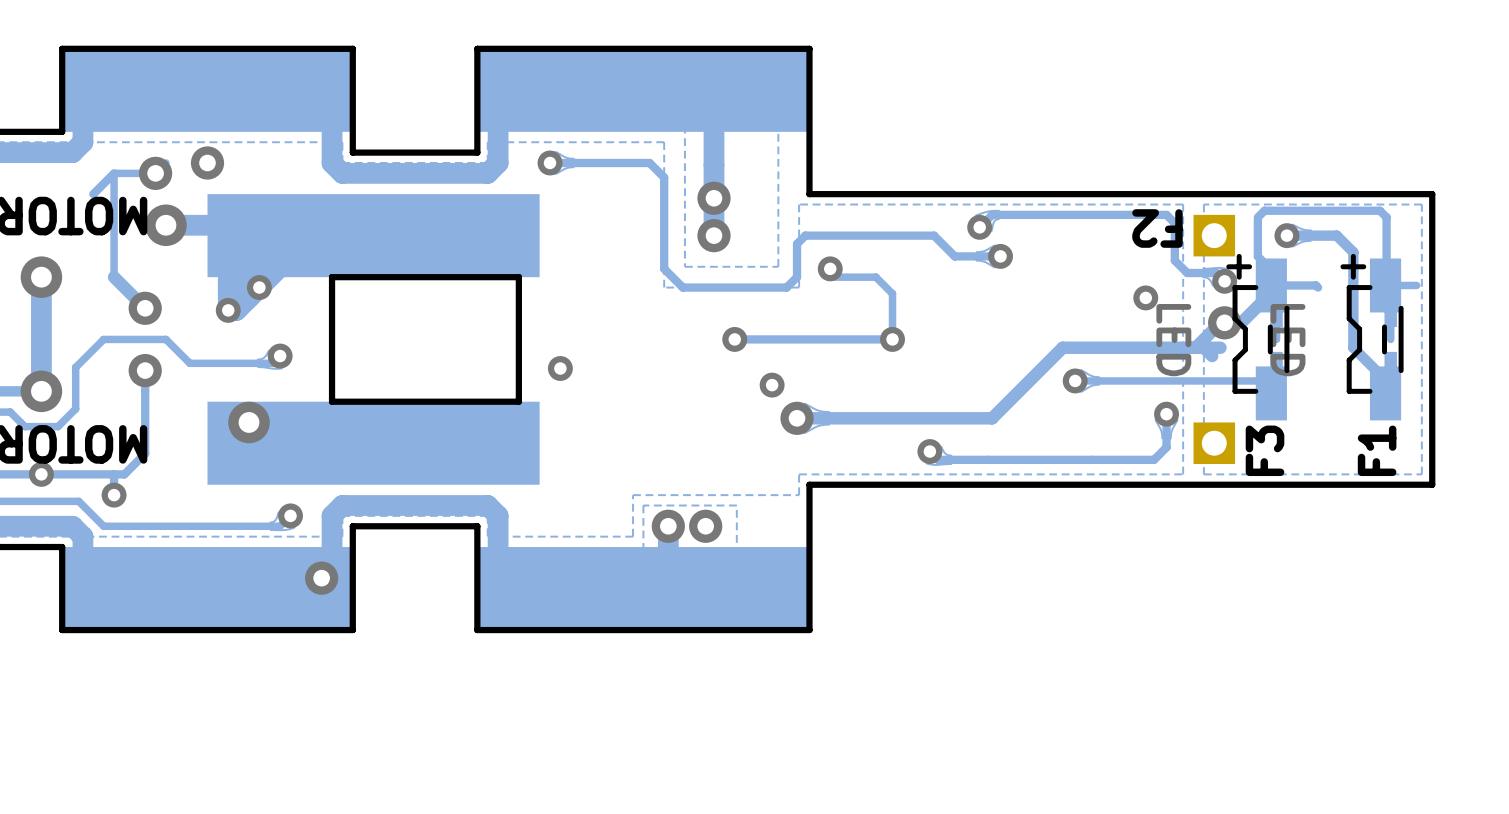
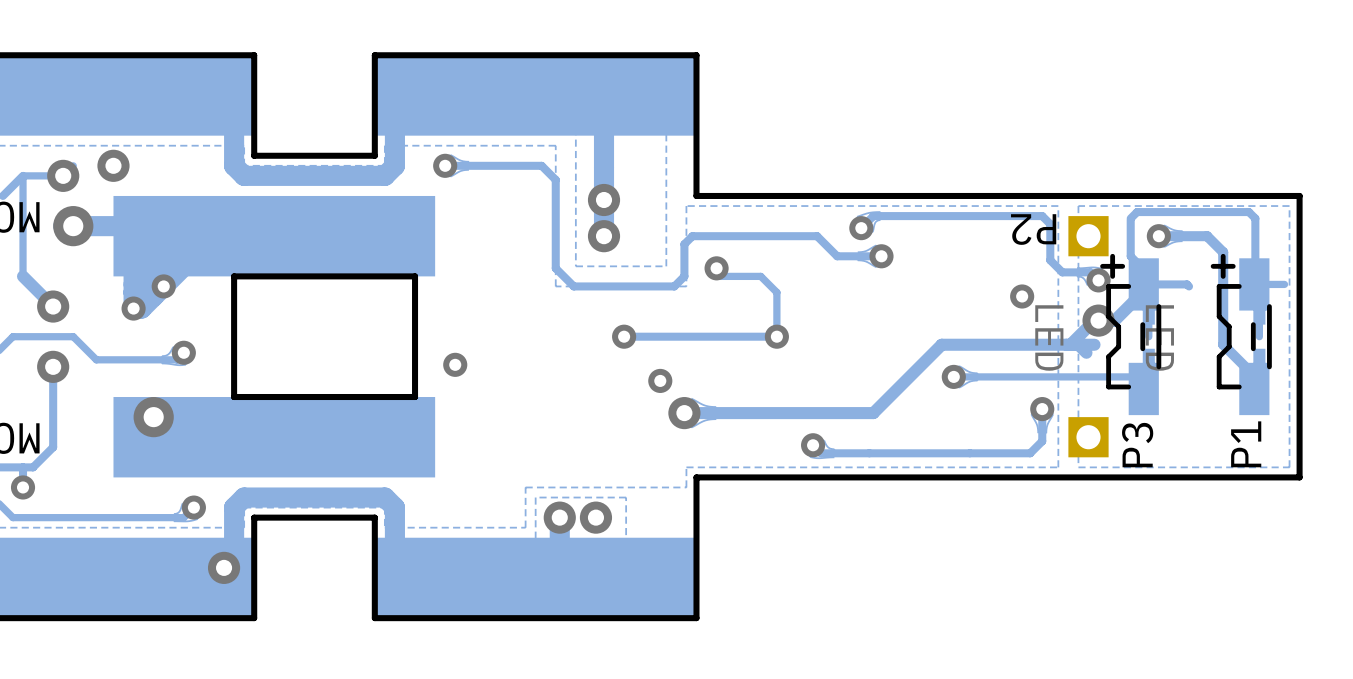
text: F2 (1157, 228) -> P2 (1033, 229)
text: F3 (1265, 450) -> P3 (1137, 445)
text: F1 (1377, 450) -> P1 (1246, 444)

